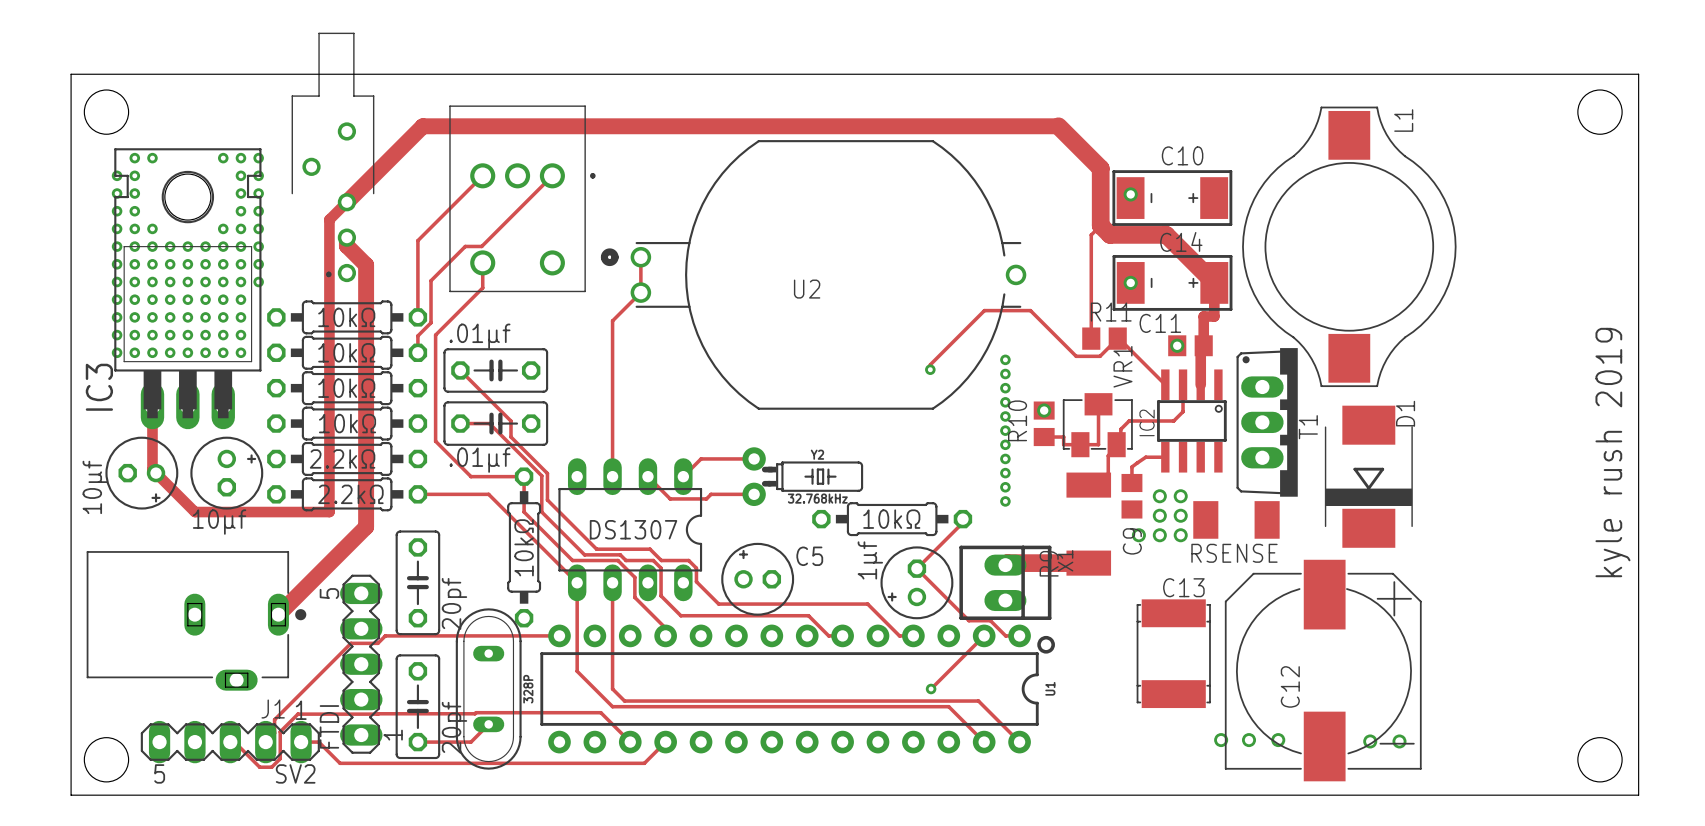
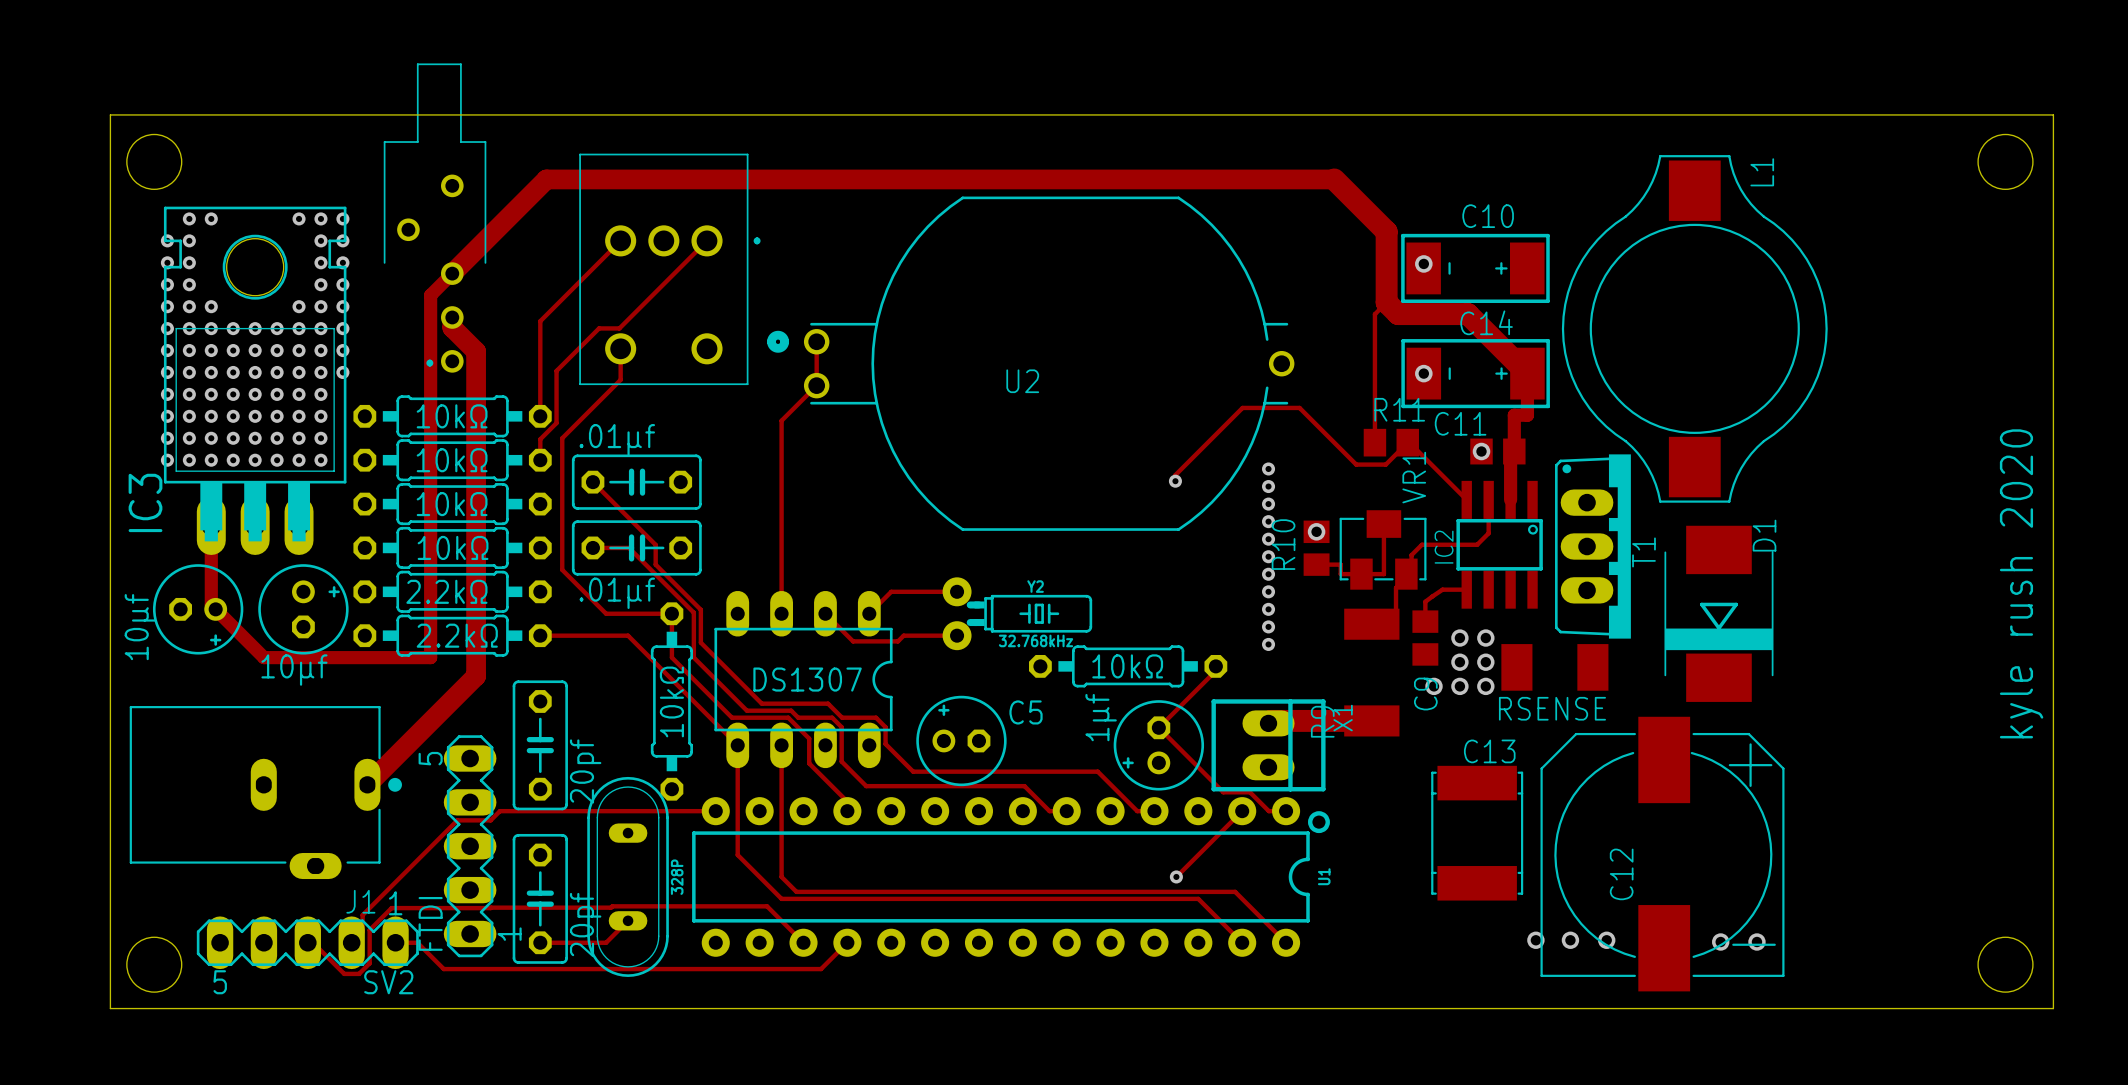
text: kyle rush 2019 (1612, 452) -> kyle rush 2020 (2021, 583)

